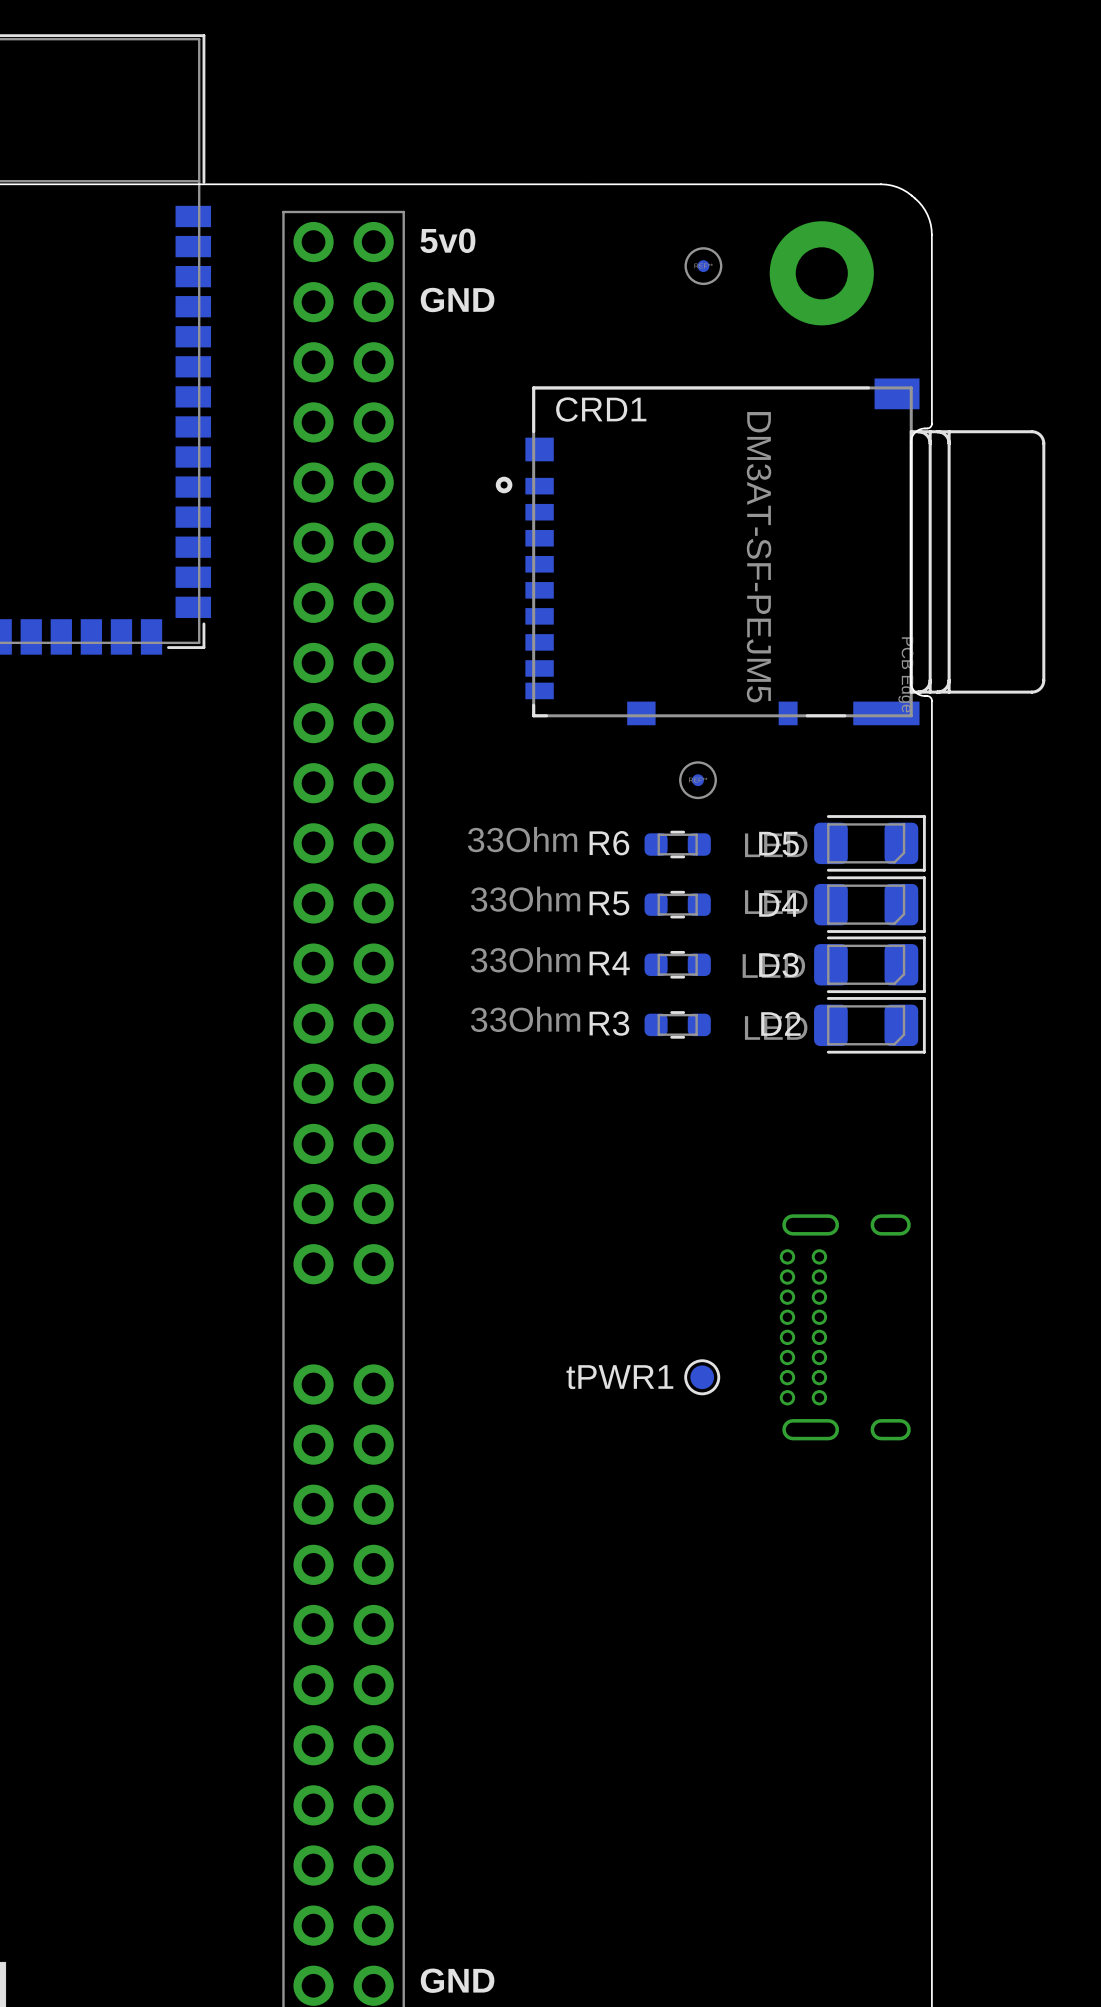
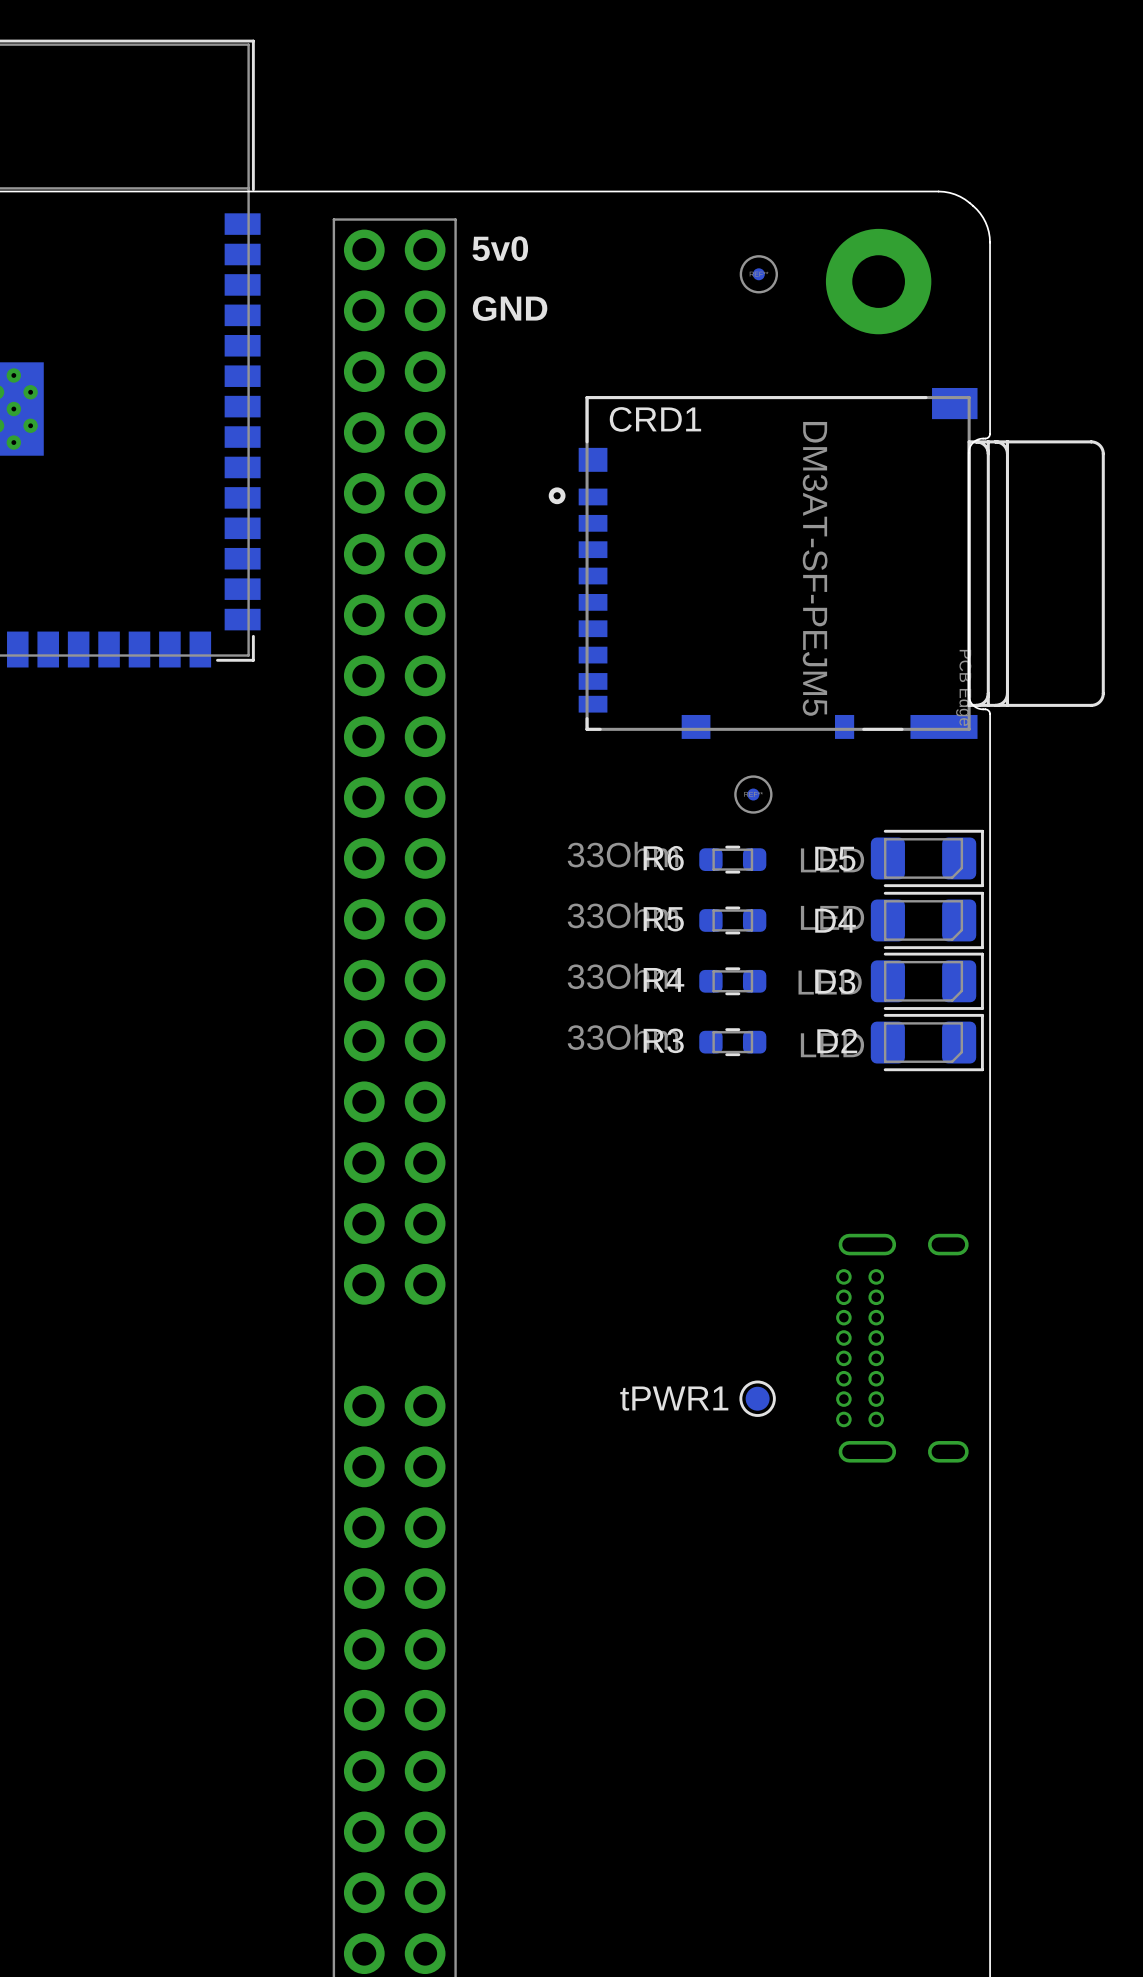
R6 value position: 33Ohm (522, 839) -> 33Ohm (623, 854)
R5 value position: 33Ohm (525, 899) -> 33Ohm (623, 915)
R4 value position: 33Ohm (525, 959) -> 33Ohm (623, 976)
R3 value position: 33Ohm (525, 1019) -> 33Ohm (623, 1037)

